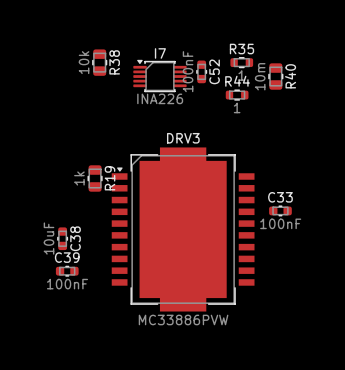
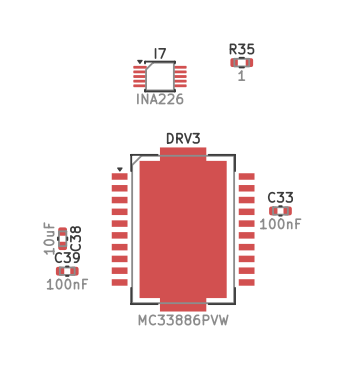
R38: 10k (99, 62) -> none
C52: 100nF (201, 71) -> none
R40: 10m (275, 76) -> none
R44: 1 (237, 95) -> none
R19: 1k (95, 178) -> none

